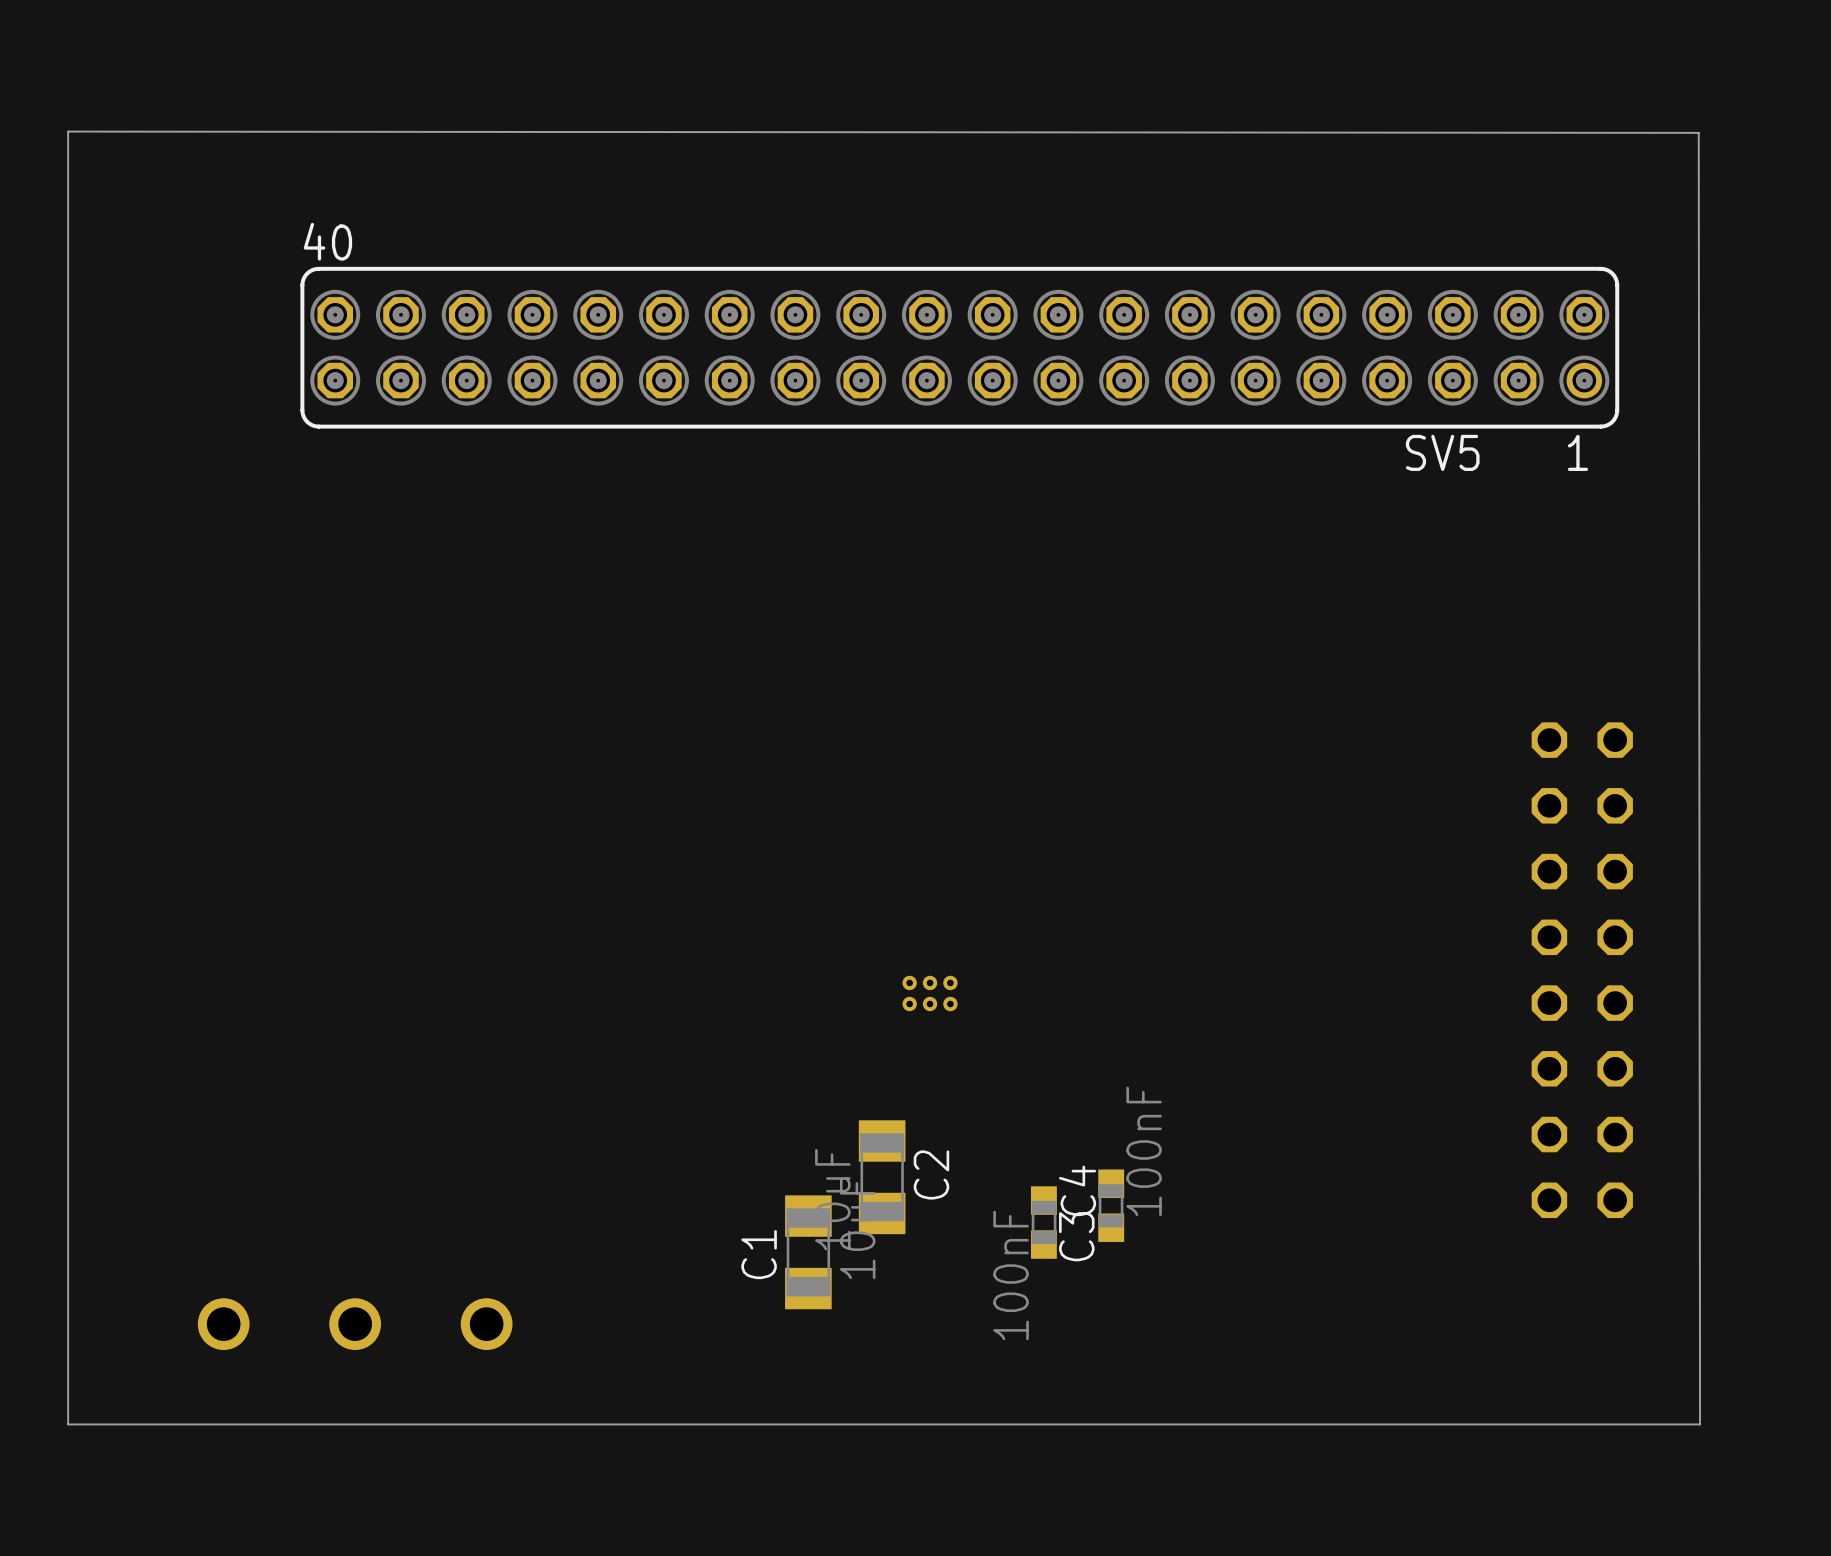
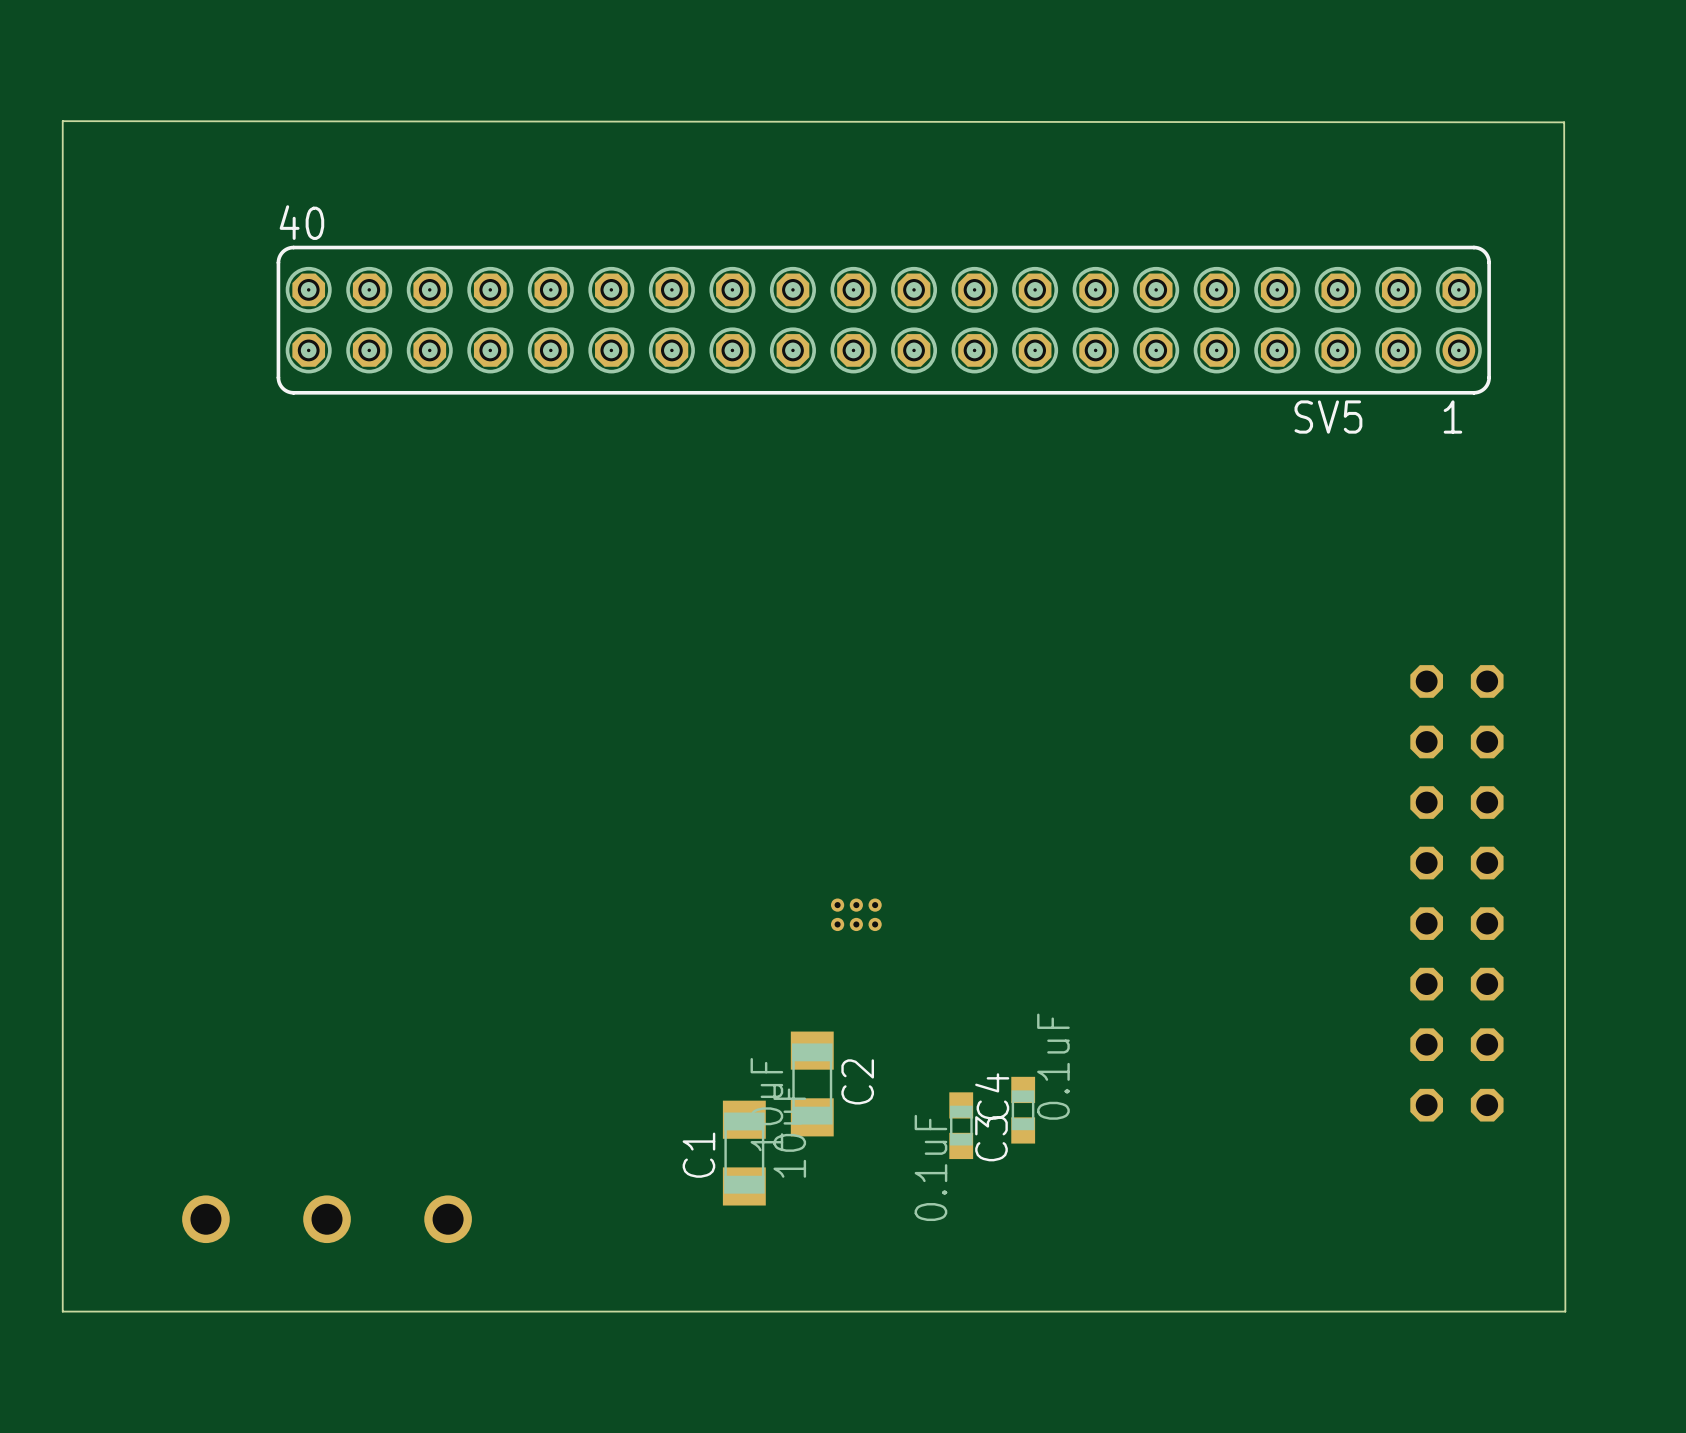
C4 value: 100nF (1144, 1151) -> 0.1uF (1053, 1066)
C3 value: 100nF (1011, 1275) -> 0.1uF (930, 1167)

